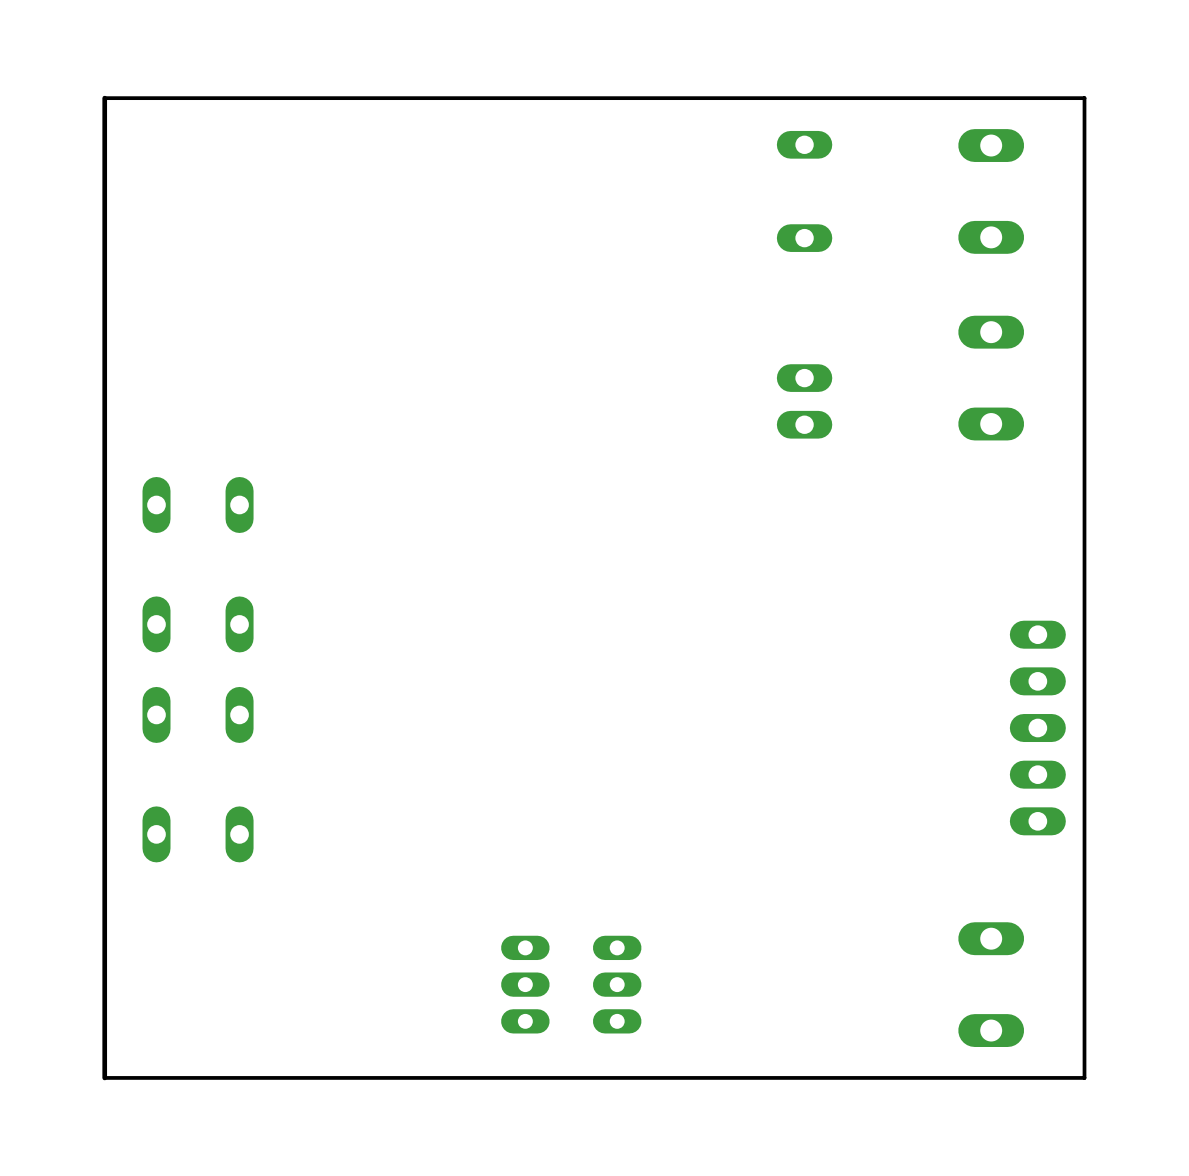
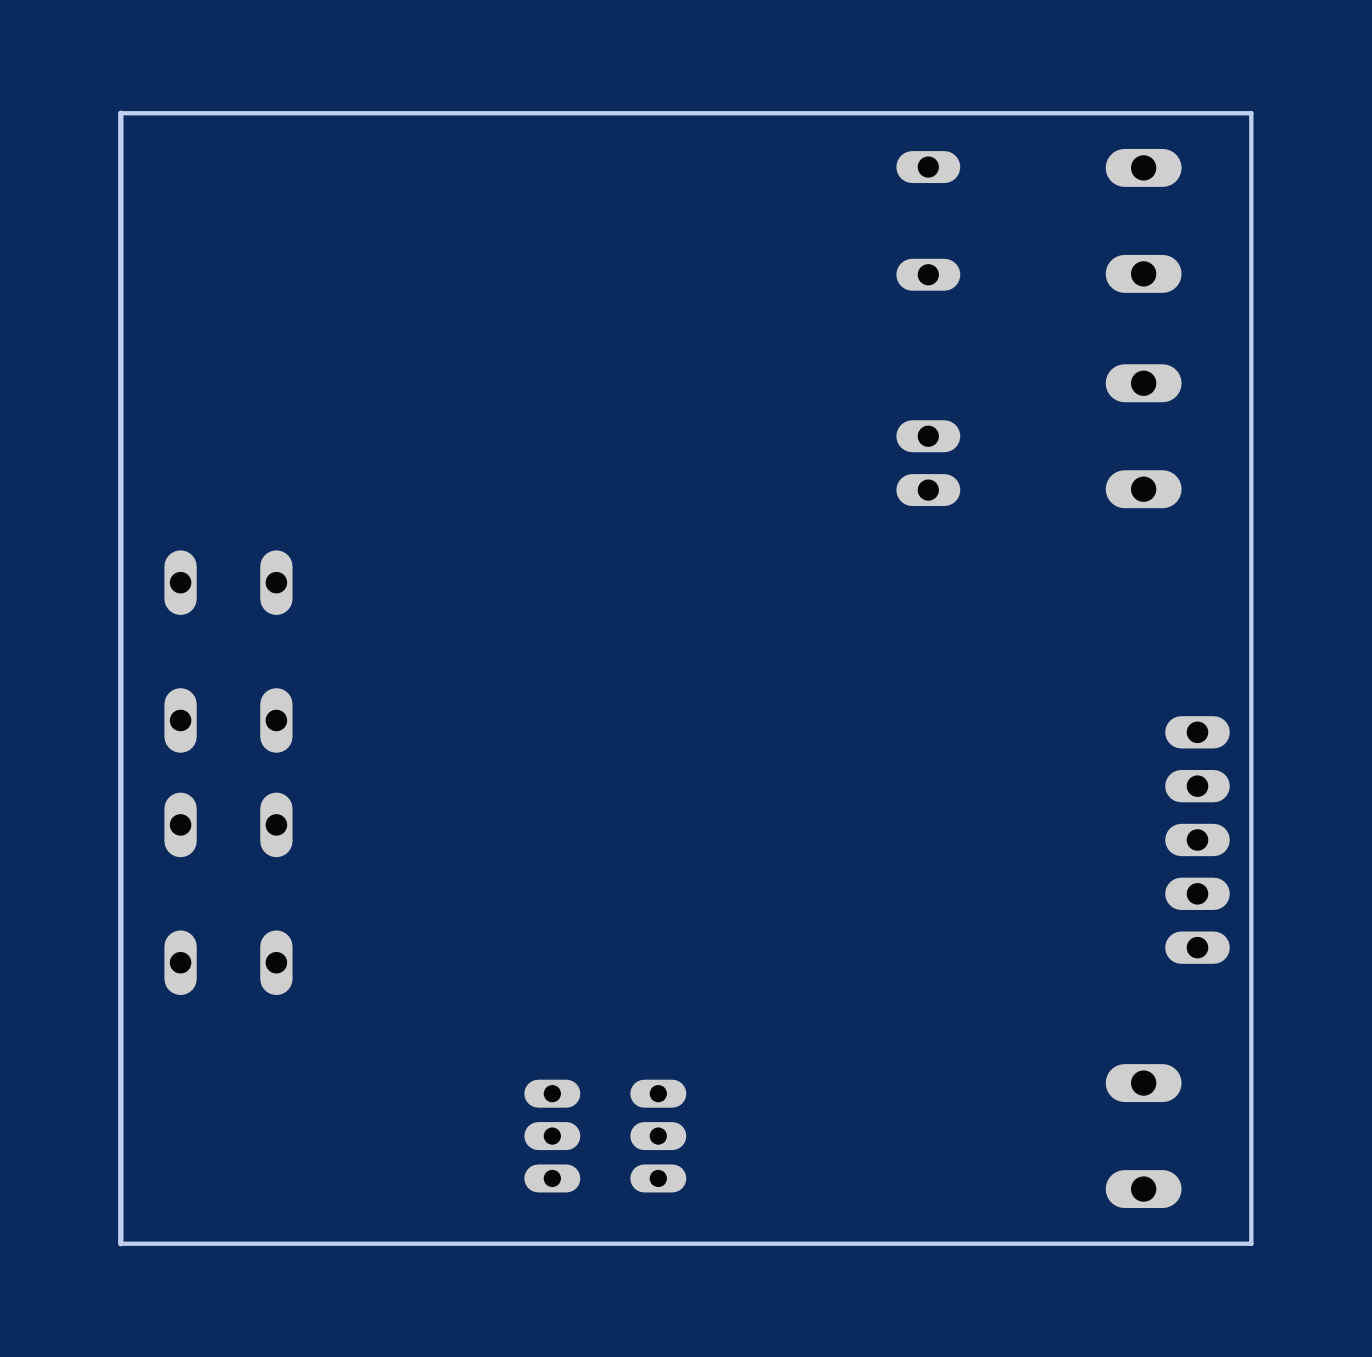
part position: (571, 984) -> (605, 1136)

